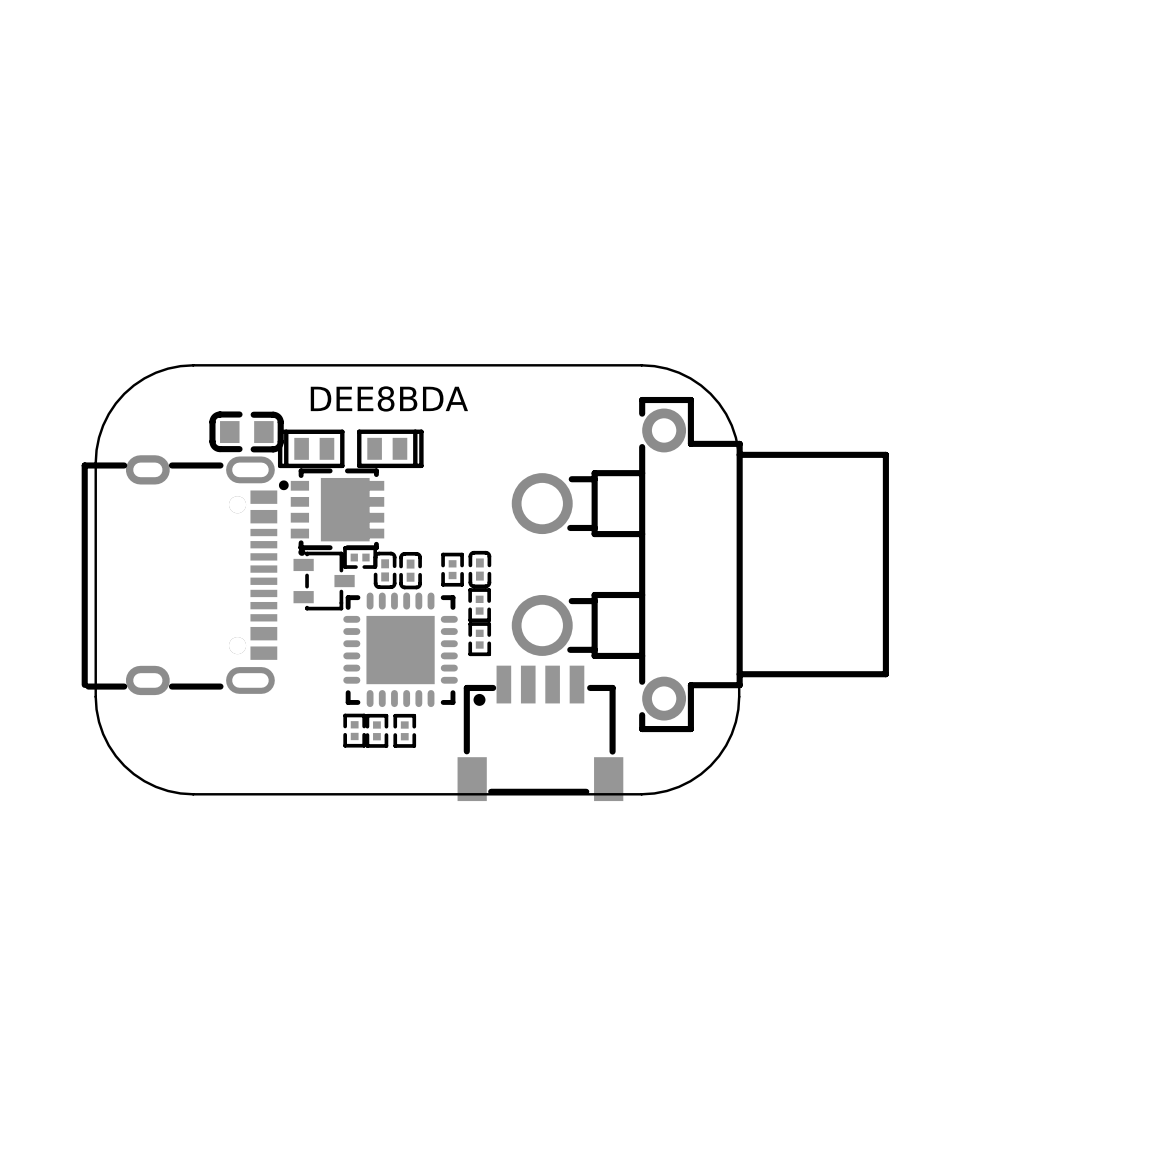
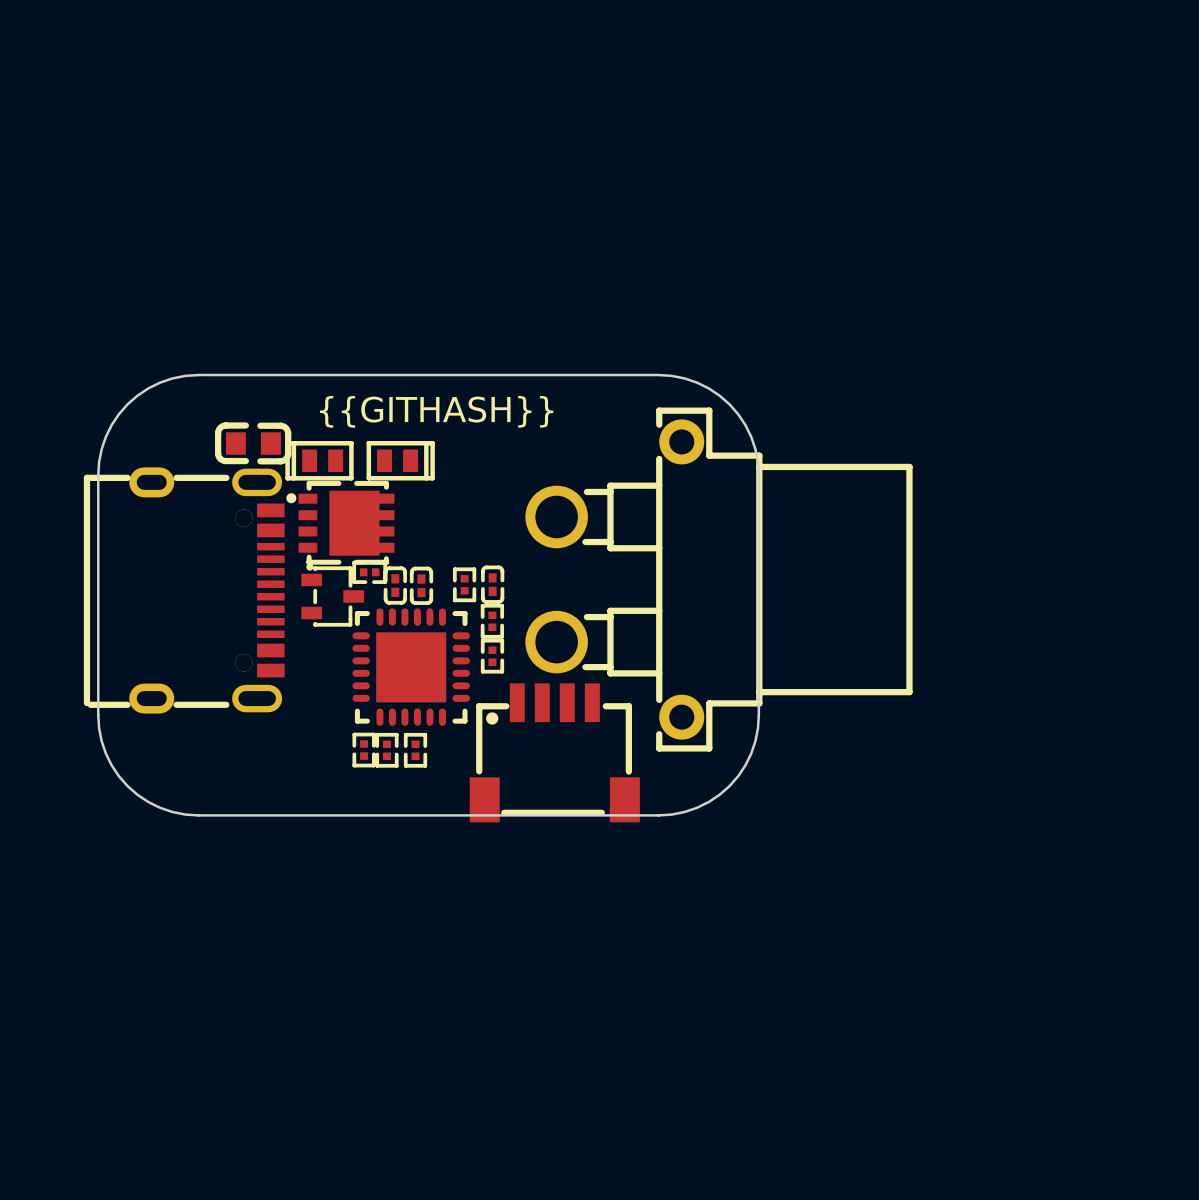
text: DEE8BDA (389, 398) -> {{GITHASH}} (436, 411)

